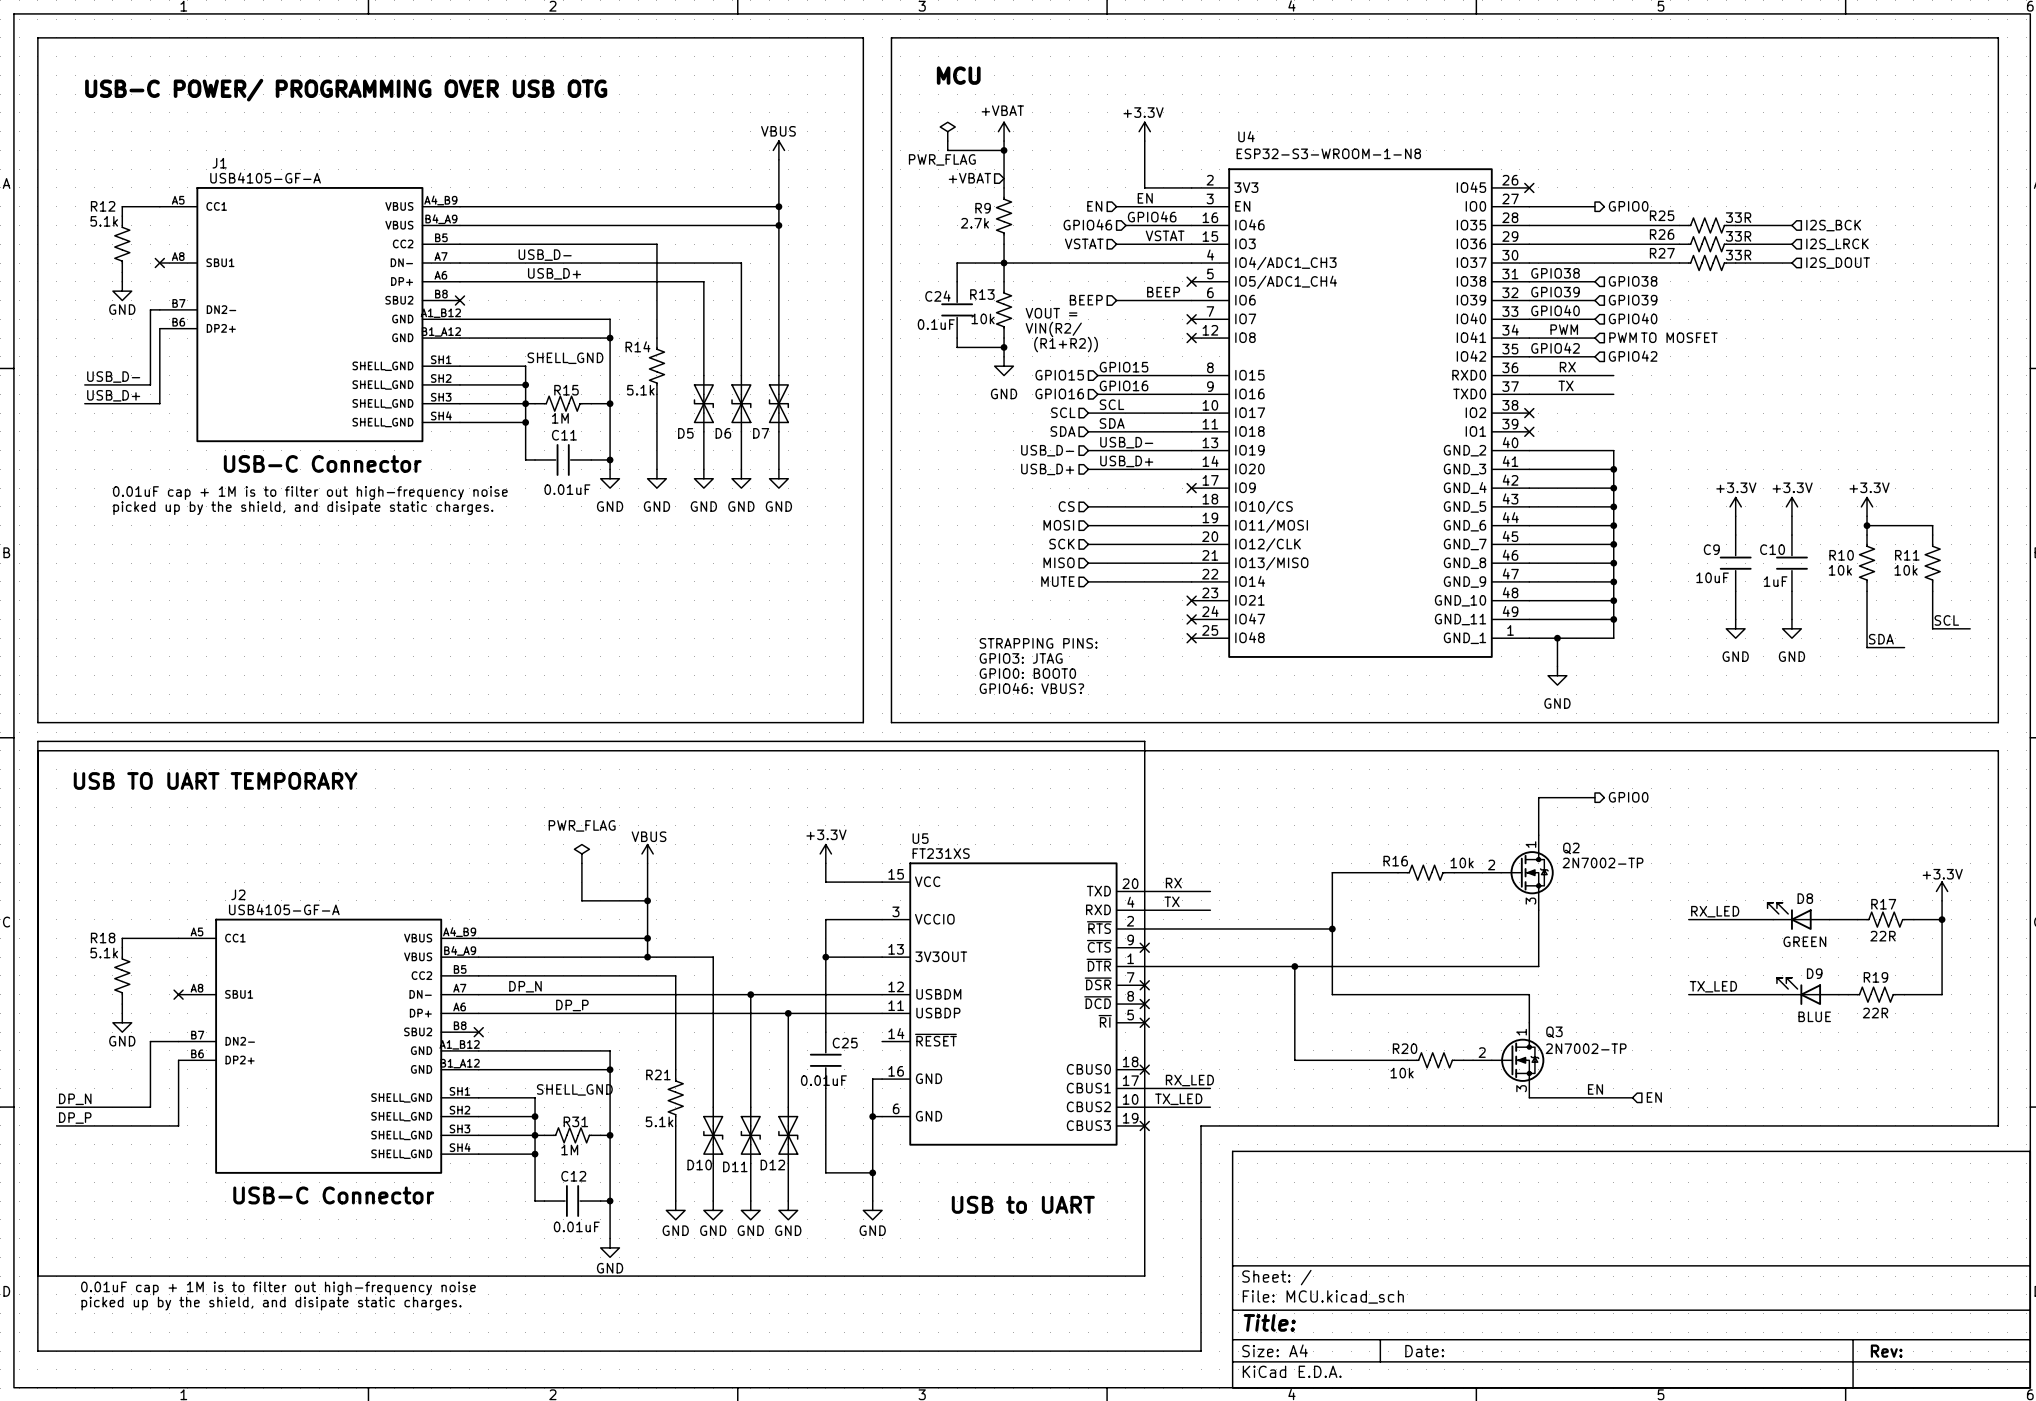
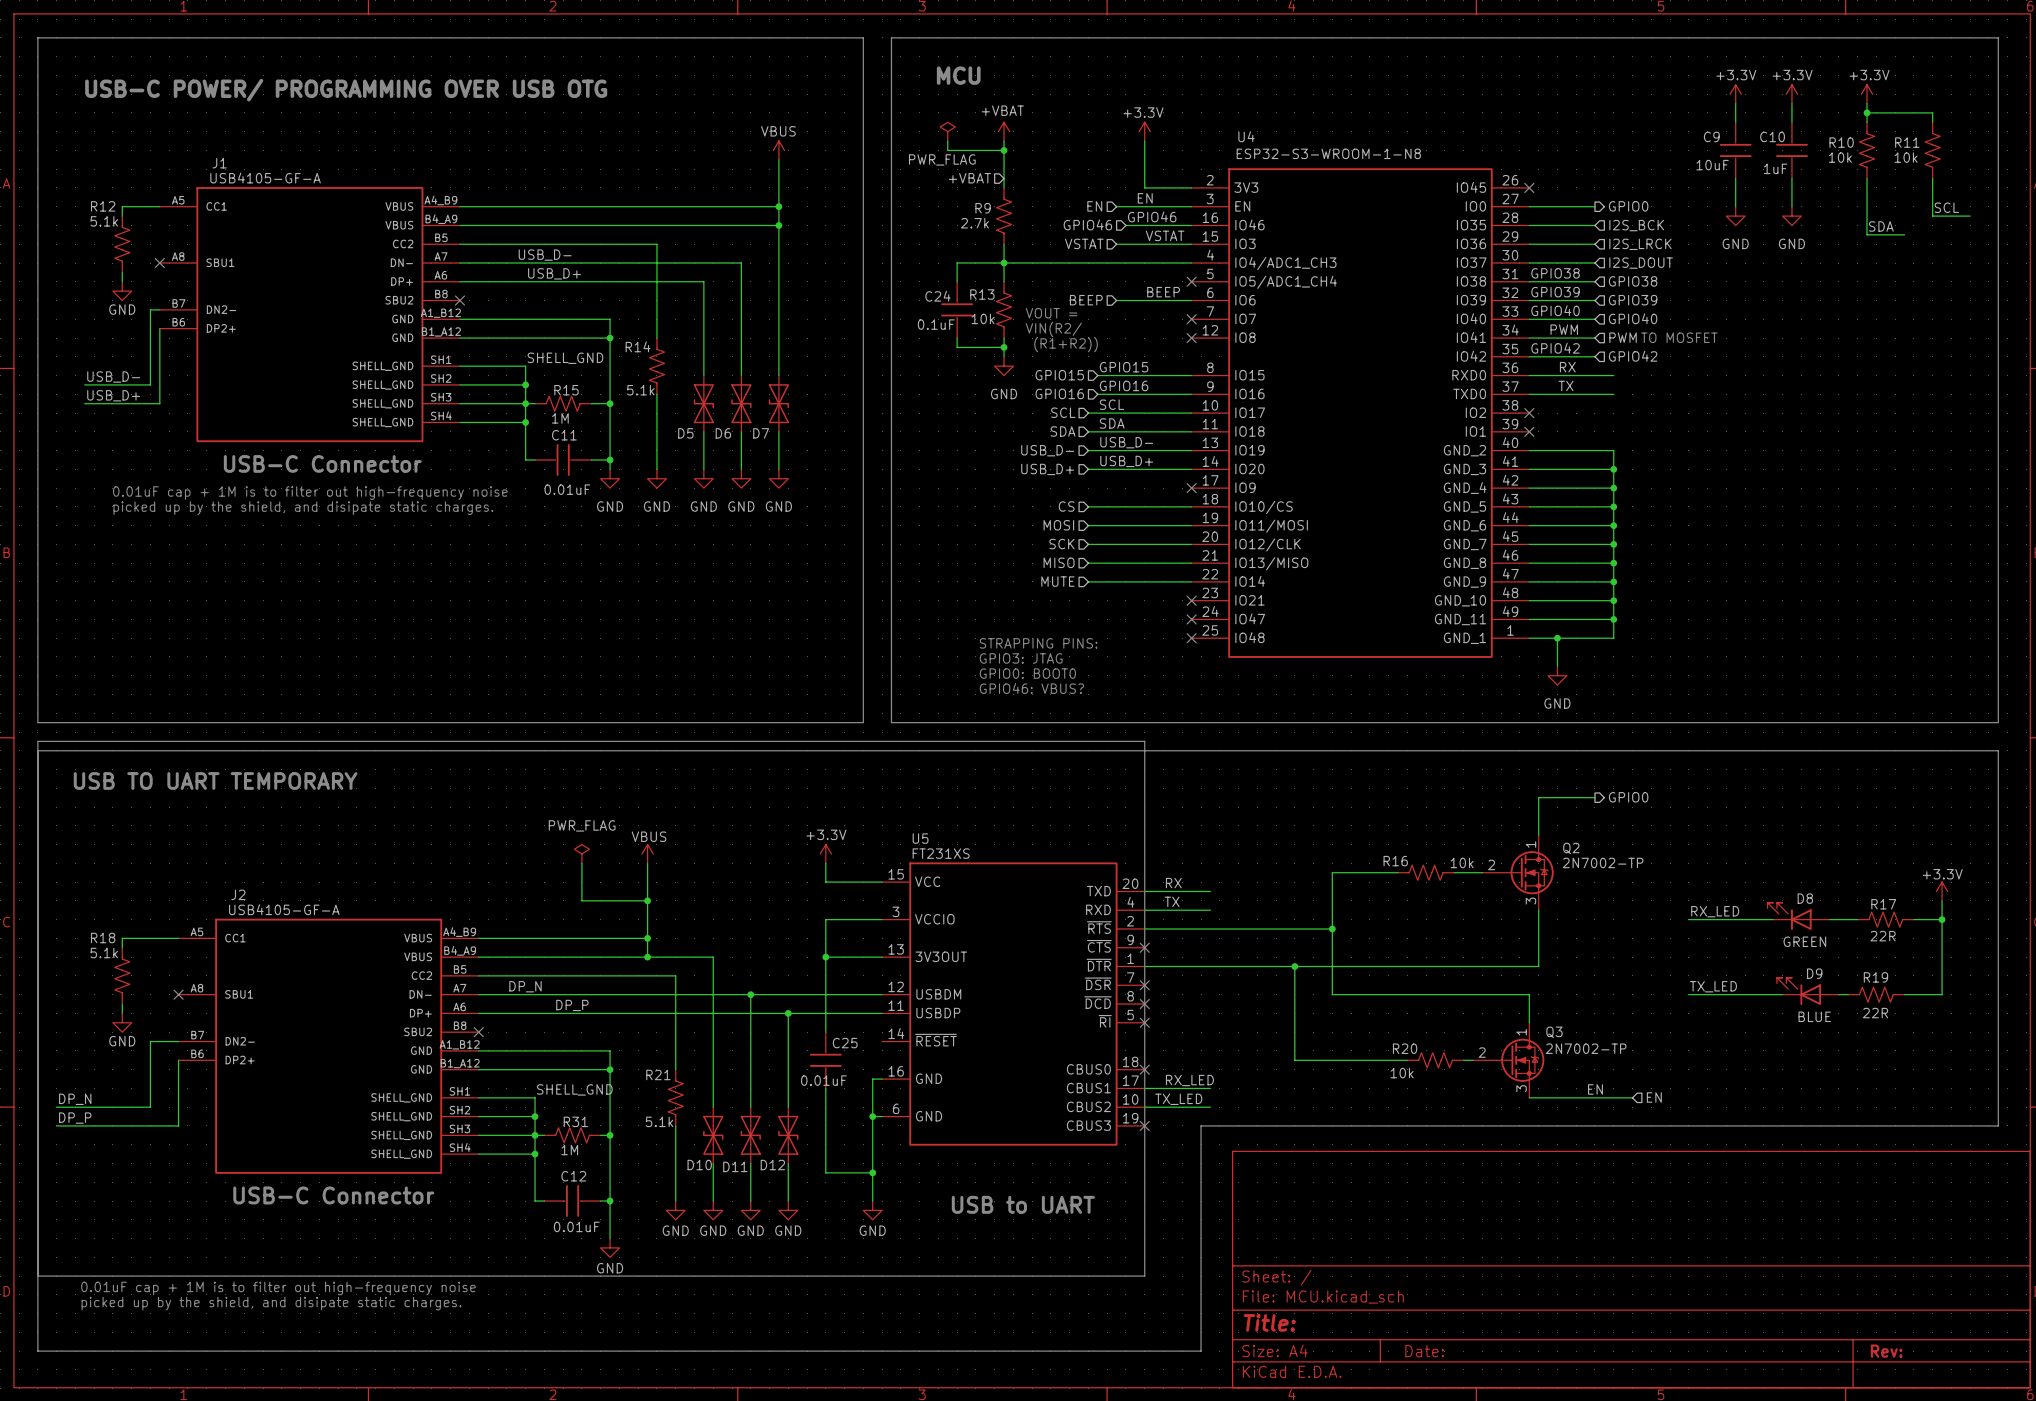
power symbol: none -> +3.3V (1735, 94)
power symbol: none -> +3.3V (1791, 94)
power symbol: none -> +3.3V (1867, 94)
wire: none -> (1735, 103) (1735, 122)
wire: none -> (1791, 103) (1791, 122)
wire: none -> (1867, 103) (1867, 122)
wire: none -> (1867, 112) (1932, 112) (1932, 122)
junction: none -> (1867, 112)
wire: none -> (1735, 178) (1735, 206)
wire: none -> (1791, 178) (1791, 206)
wire: none -> (1867, 178) (1867, 234) (1904, 234)
wire: none -> (1932, 178) (1932, 216) (1970, 216)
label: none -> SCL (1946, 207)
power symbol: none -> GND (1735, 216)
power symbol: none -> GND (1791, 216)
wire: (1594, 225) (1679, 225) -> none
hierarchical label: none -> I2S_BCK (1636, 225)
R25: 33R (1707, 225) -> none
wire: (1735, 225) (1791, 225) -> none
hierarchical label: I2S_BCK (1833, 225) -> none
label: none -> SDA (1881, 226)
wire: (1594, 244) (1679, 244) -> none
hierarchical label: none -> I2S_LRCK (1640, 244)
R26: 33R (1707, 244) -> none
wire: (1735, 244) (1791, 244) -> none
hierarchical label: I2S_LRCK (1837, 244) -> none
wire: (1594, 263) (1679, 263) -> none
hierarchical label: none -> I2S_DOUT (1641, 263)
R27: 33R (1707, 263) -> none
wire: (1735, 263) (1791, 263) -> none
hierarchical label: I2S_DOUT (1838, 263) -> none
power symbol: +3.3V (1735, 506) -> none
power symbol: +3.3V (1791, 506) -> none
power symbol: +3.3V (1867, 506) -> none
wire: (1735, 516) (1735, 535) -> none
wire: (1791, 516) (1791, 535) -> none
wire: (1867, 516) (1867, 535) -> none
wire: (1867, 525) (1932, 525) (1932, 535) -> none
junction: (1867, 525) -> none
C9 position: (1735, 563) -> (1735, 150)
C10 position: (1791, 563) -> (1791, 150)
R10 position: (1867, 563) -> (1867, 150)
R11 position: (1932, 563) -> (1932, 150)
wire: (1735, 591) (1735, 619) -> none
wire: (1791, 591) (1791, 619) -> none
wire: (1867, 591) (1867, 647) (1904, 647) -> none
wire: (1932, 591) (1932, 628) (1970, 628) -> none
label: SCL (1946, 620) -> none
power symbol: GND (1735, 628) -> none
power symbol: GND (1791, 628) -> none
label: SDA (1881, 639) -> none

